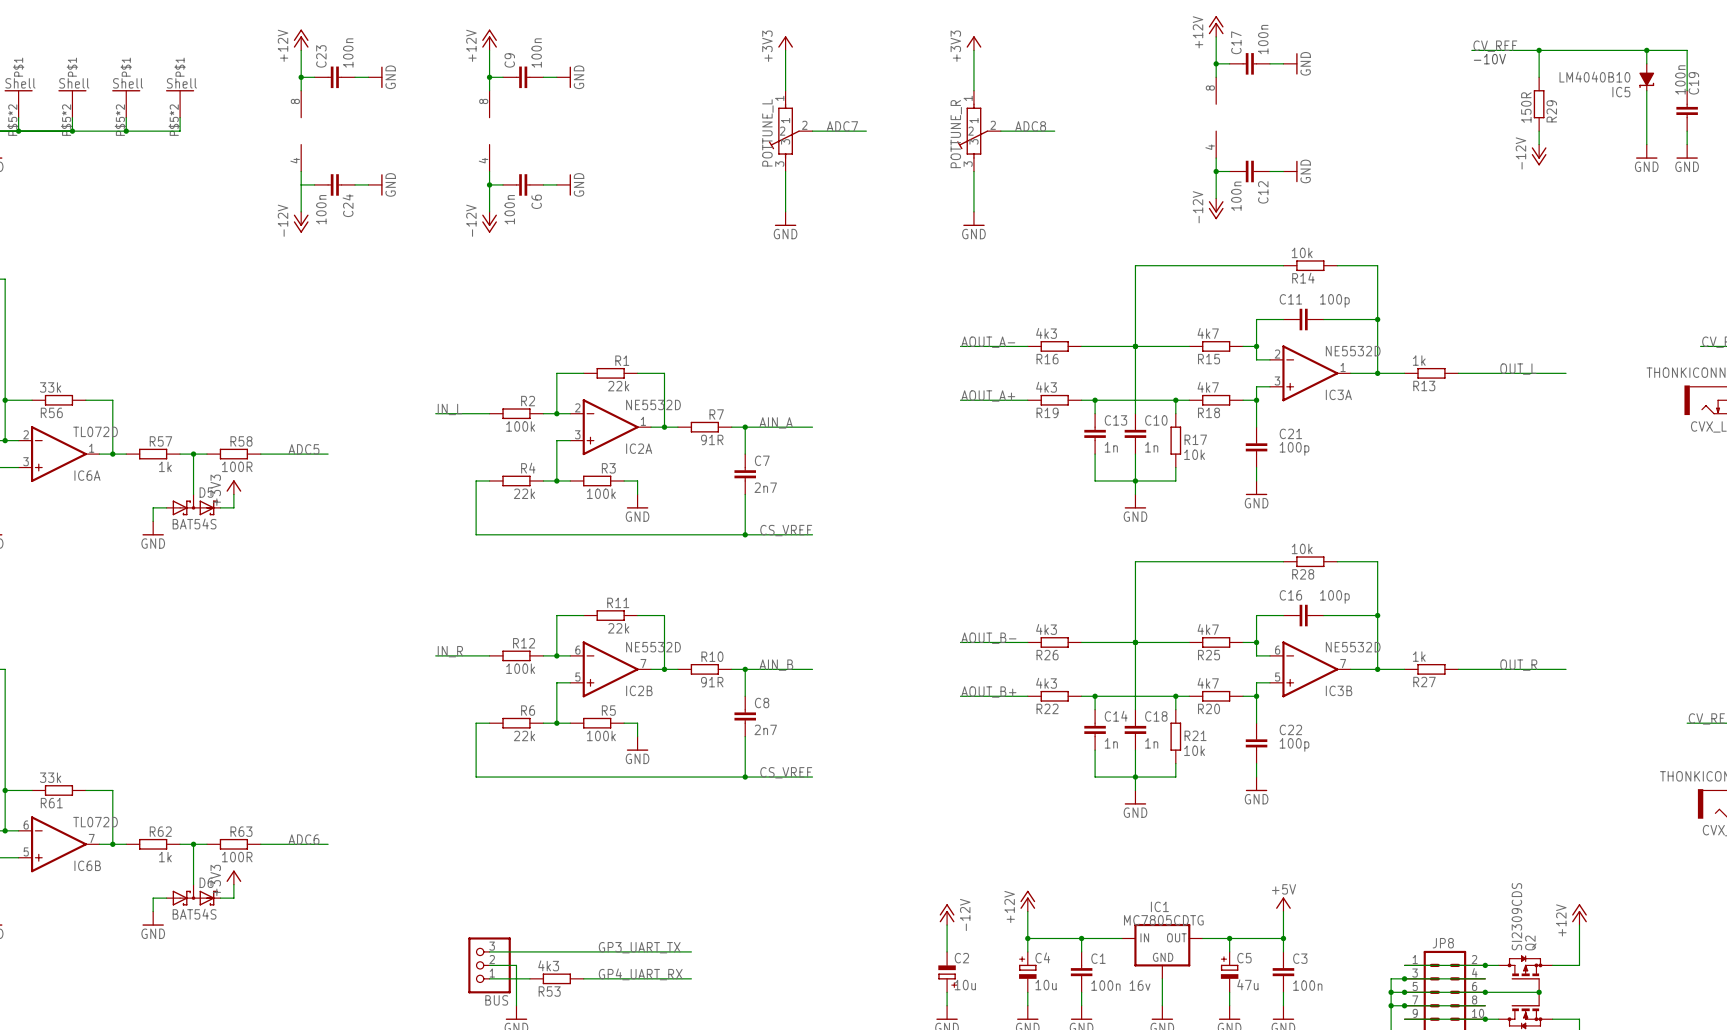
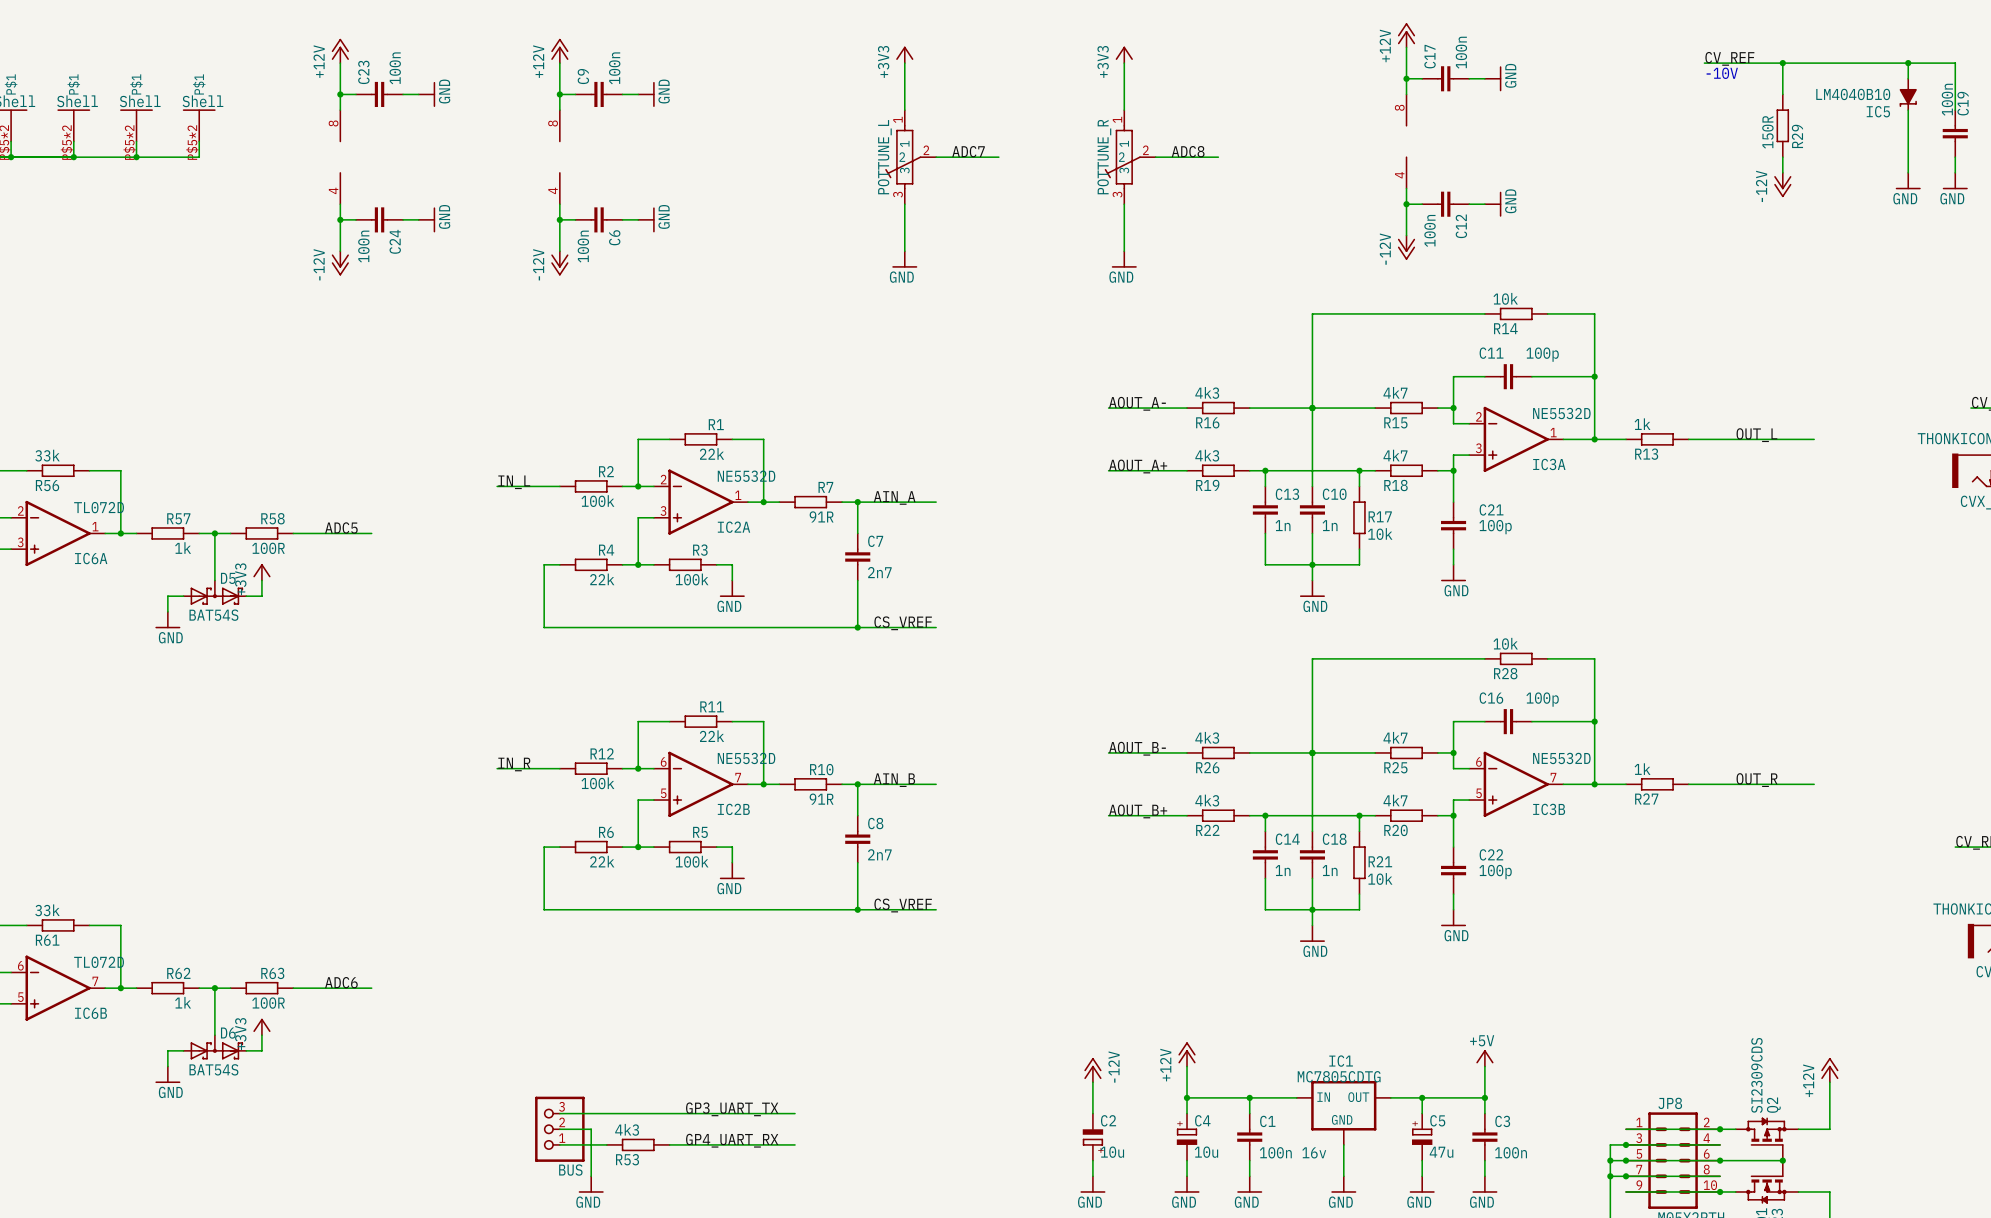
junction: none -> (340, 219)

